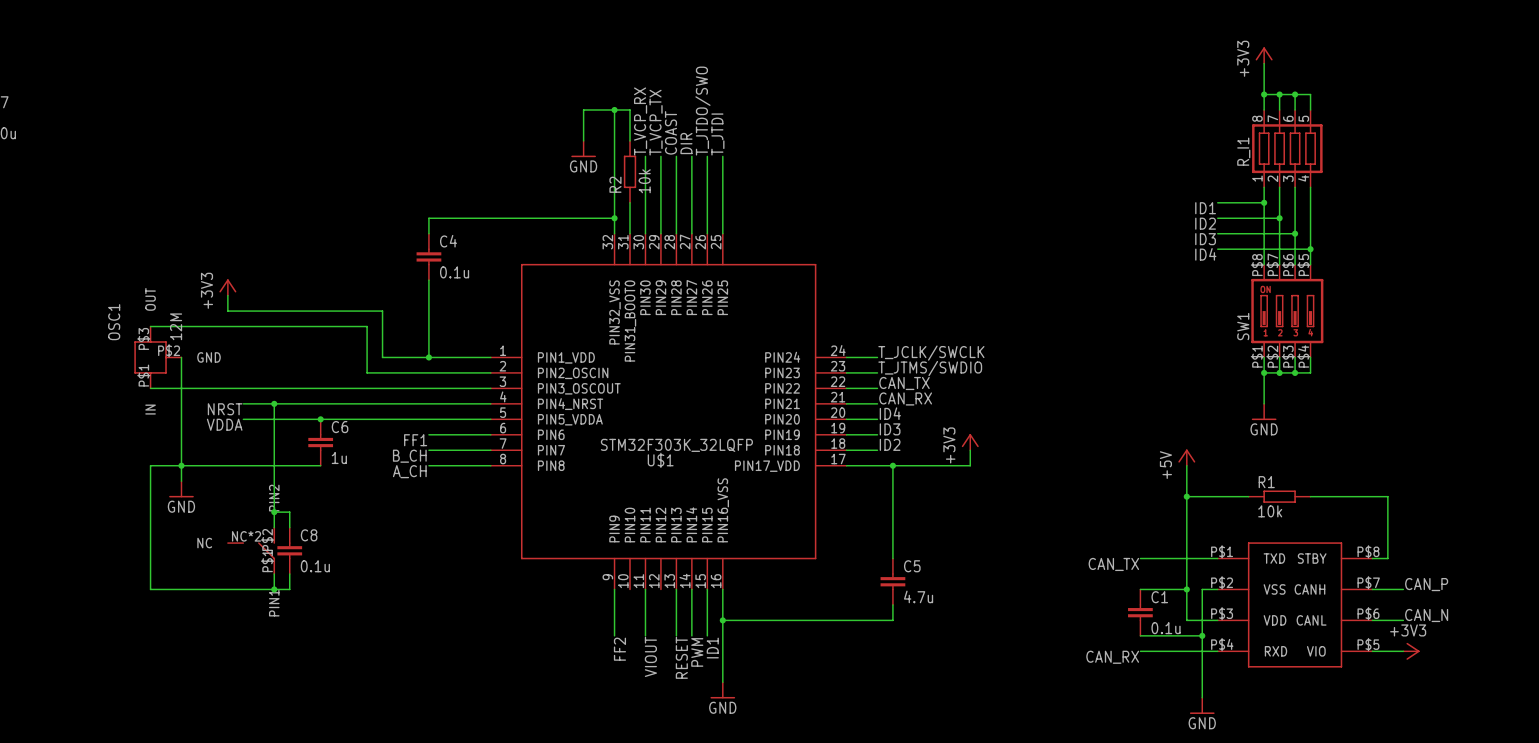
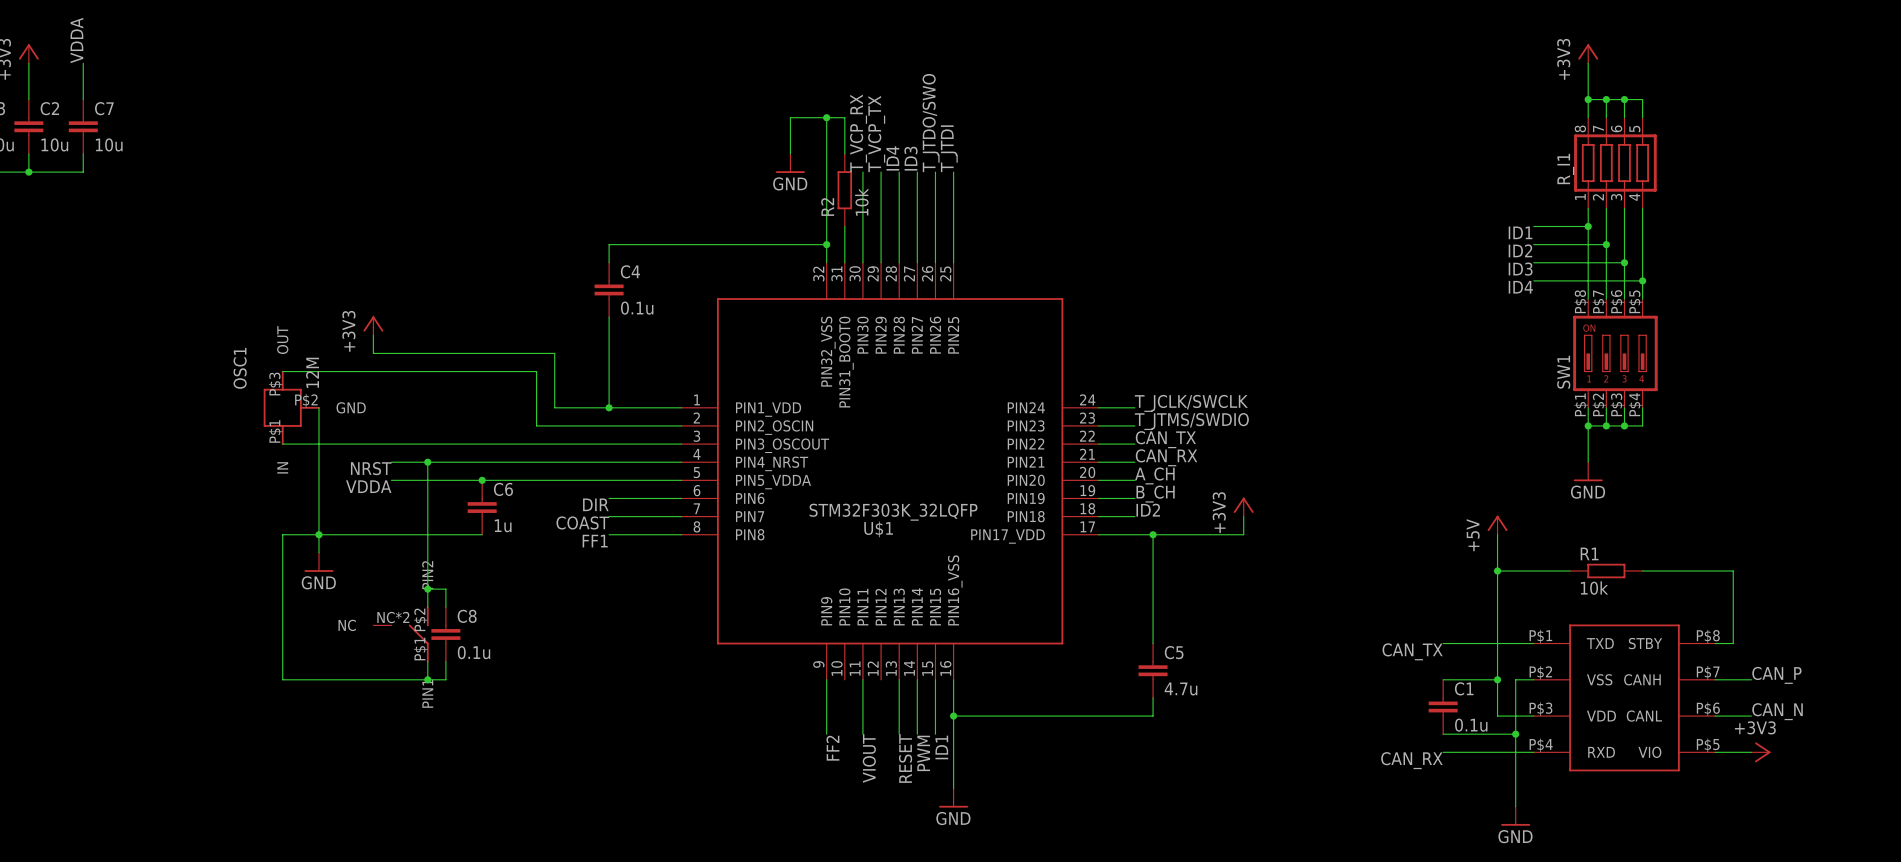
label: COAST (670, 132) -> ID4 (892, 158)
label: DIR (686, 143) -> ID3 (911, 158)
label: ID4 (890, 413) -> A_CH (1154, 475)
label: ID3 (890, 429) -> B_CH (1155, 494)
label: FF1 (415, 440) -> DIR (595, 504)
label: B_CH (409, 456) -> COAST (582, 522)
label: A_CH (409, 471) -> FF1 (595, 541)

